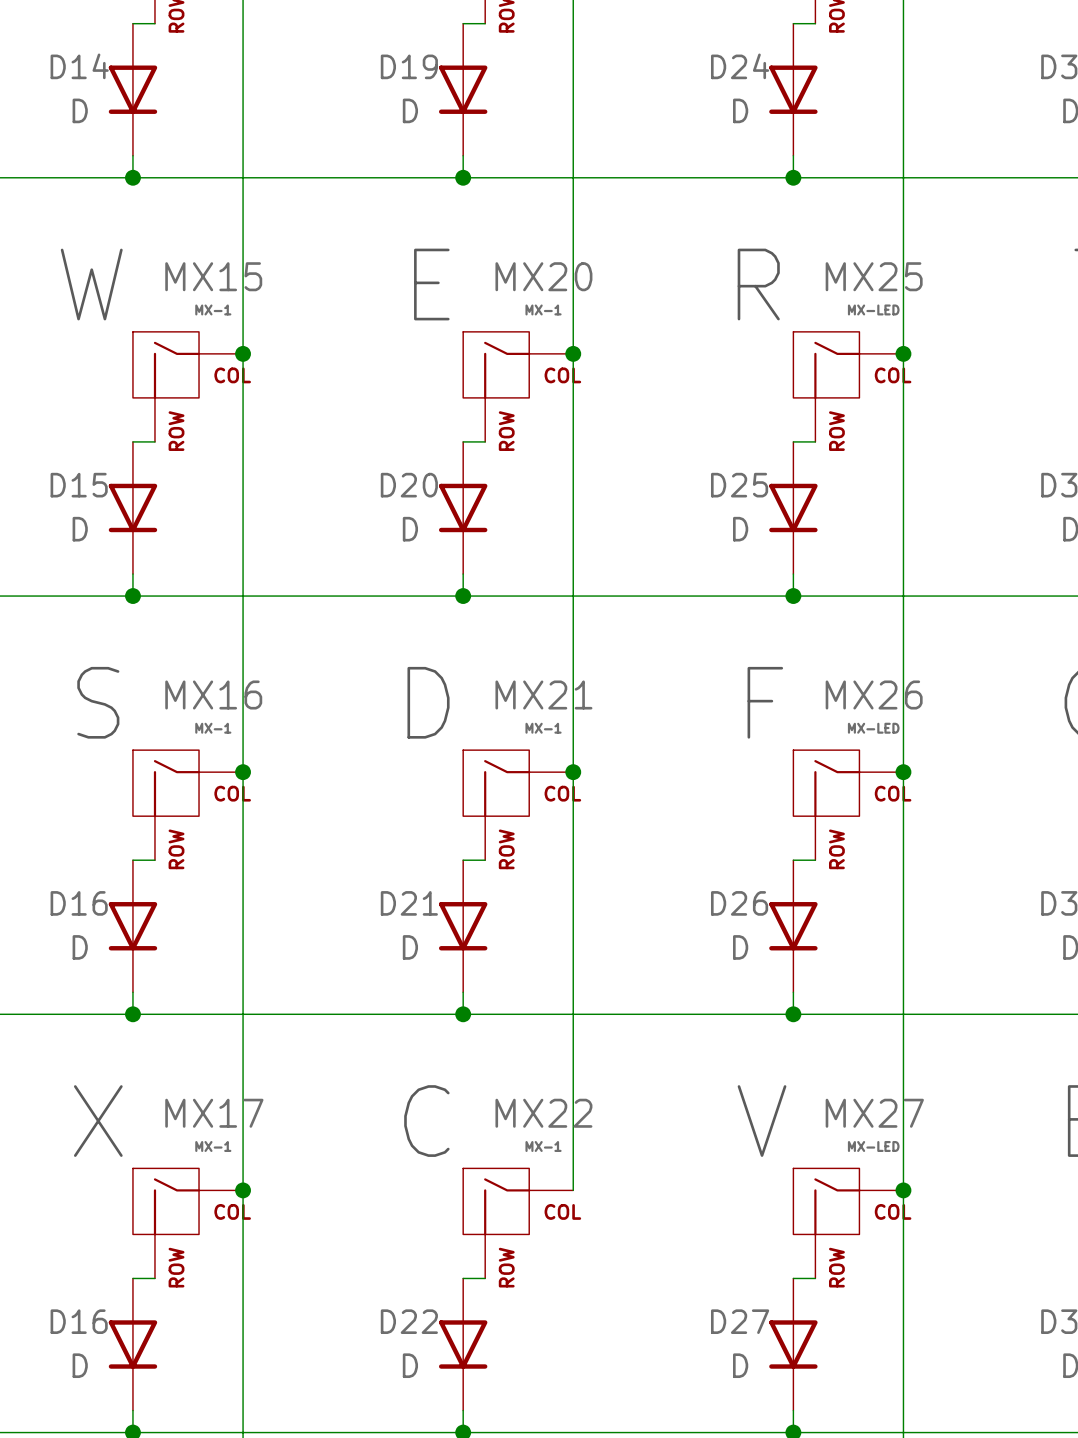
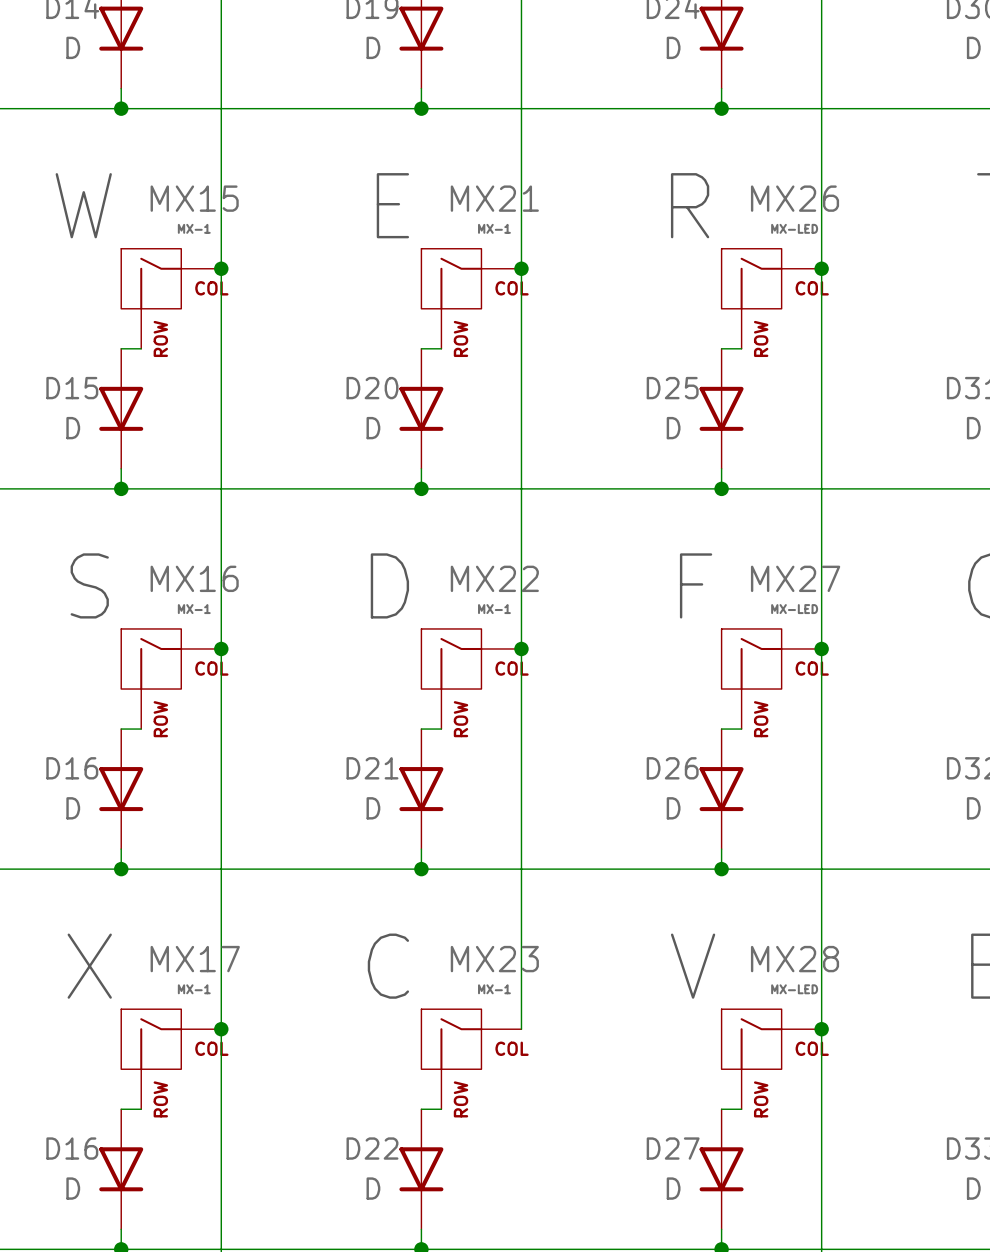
MX20 name: MX20 (543, 276) -> MX21 (494, 198)
MX25 name: MX25 (874, 276) -> MX26 (795, 198)
MX21 name: MX21 (543, 694) -> MX22 (494, 578)
MX26 name: MX26 (874, 694) -> MX27 (795, 578)
MX22 name: MX22 (543, 1113) -> MX23 (494, 959)
MX27 name: MX27 (874, 1113) -> MX28 (795, 959)

